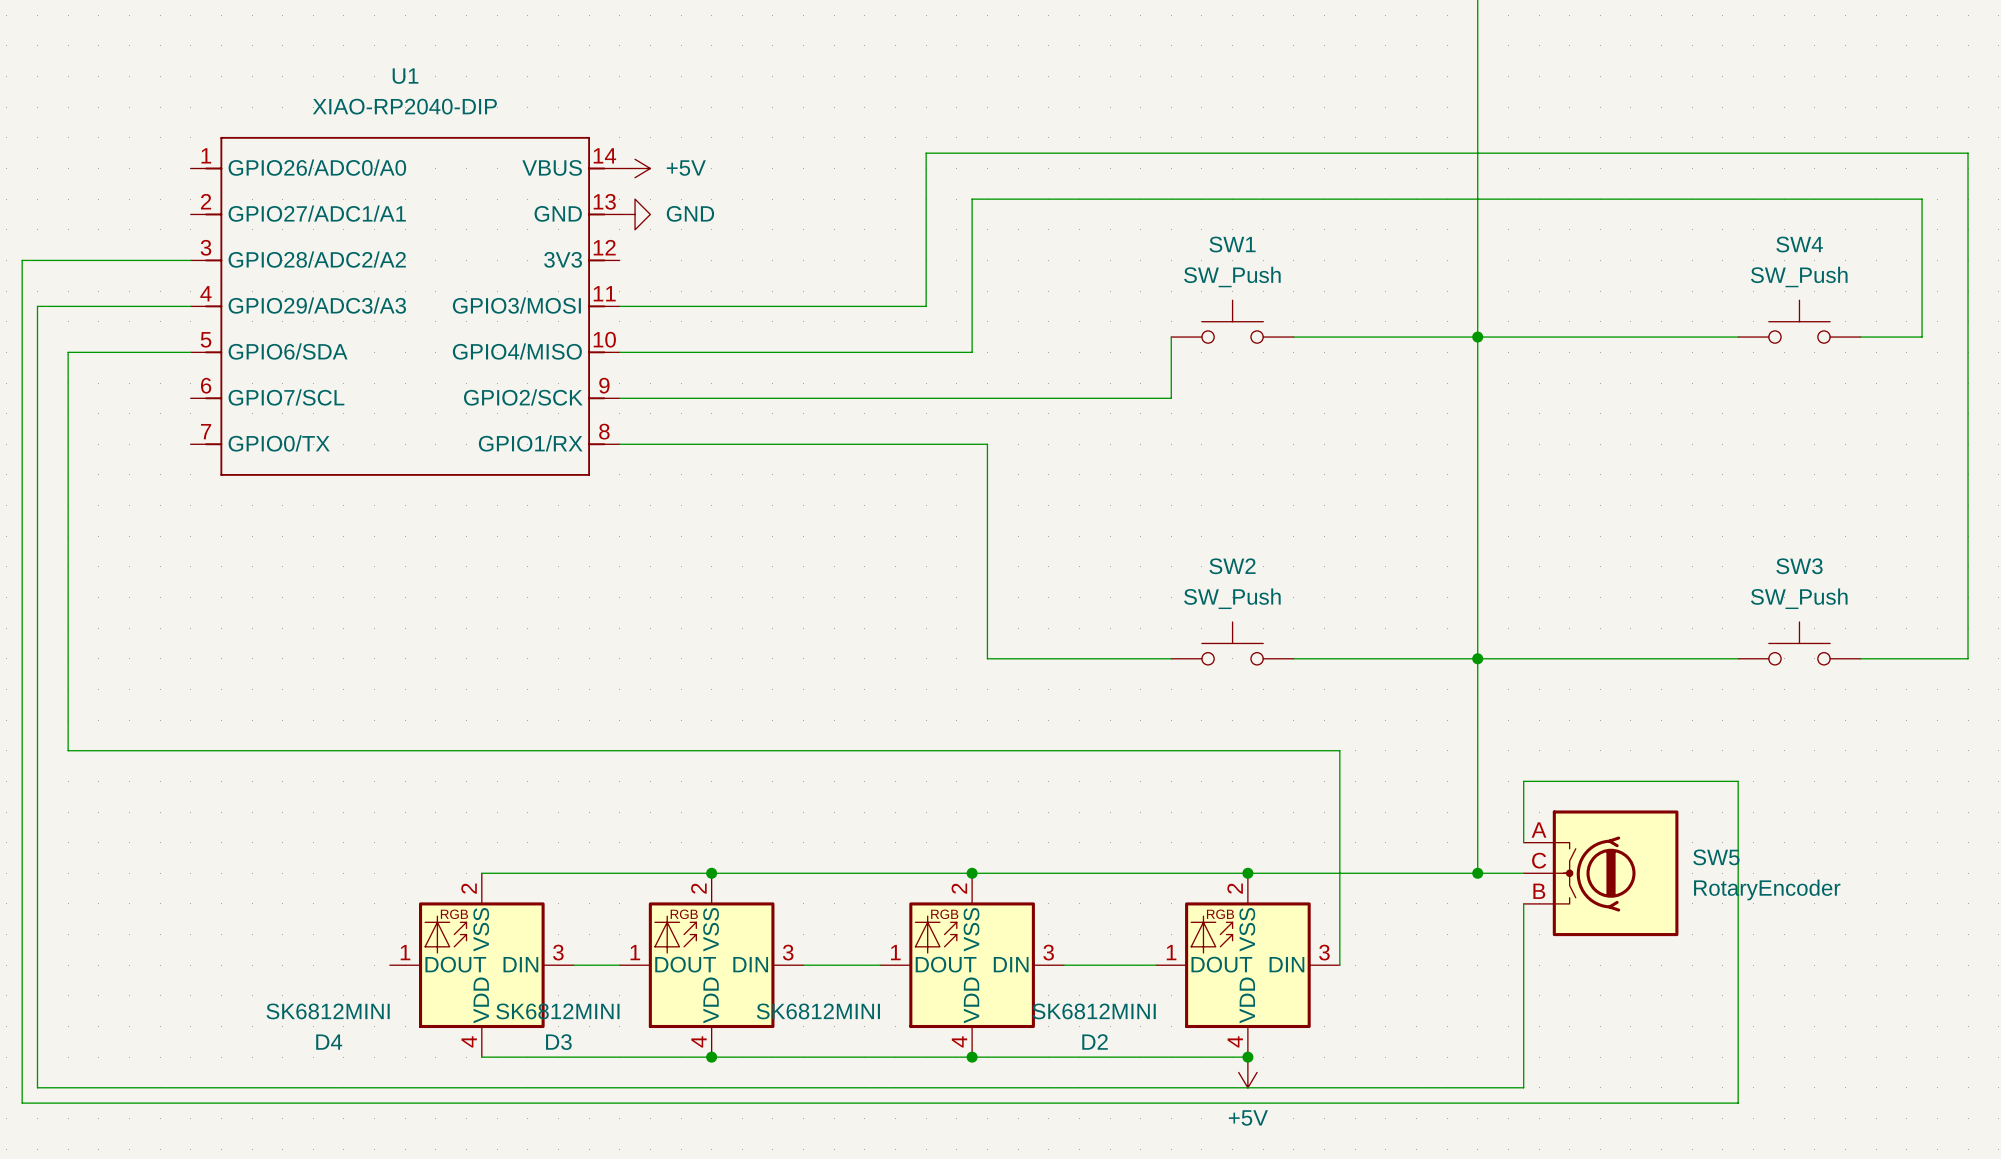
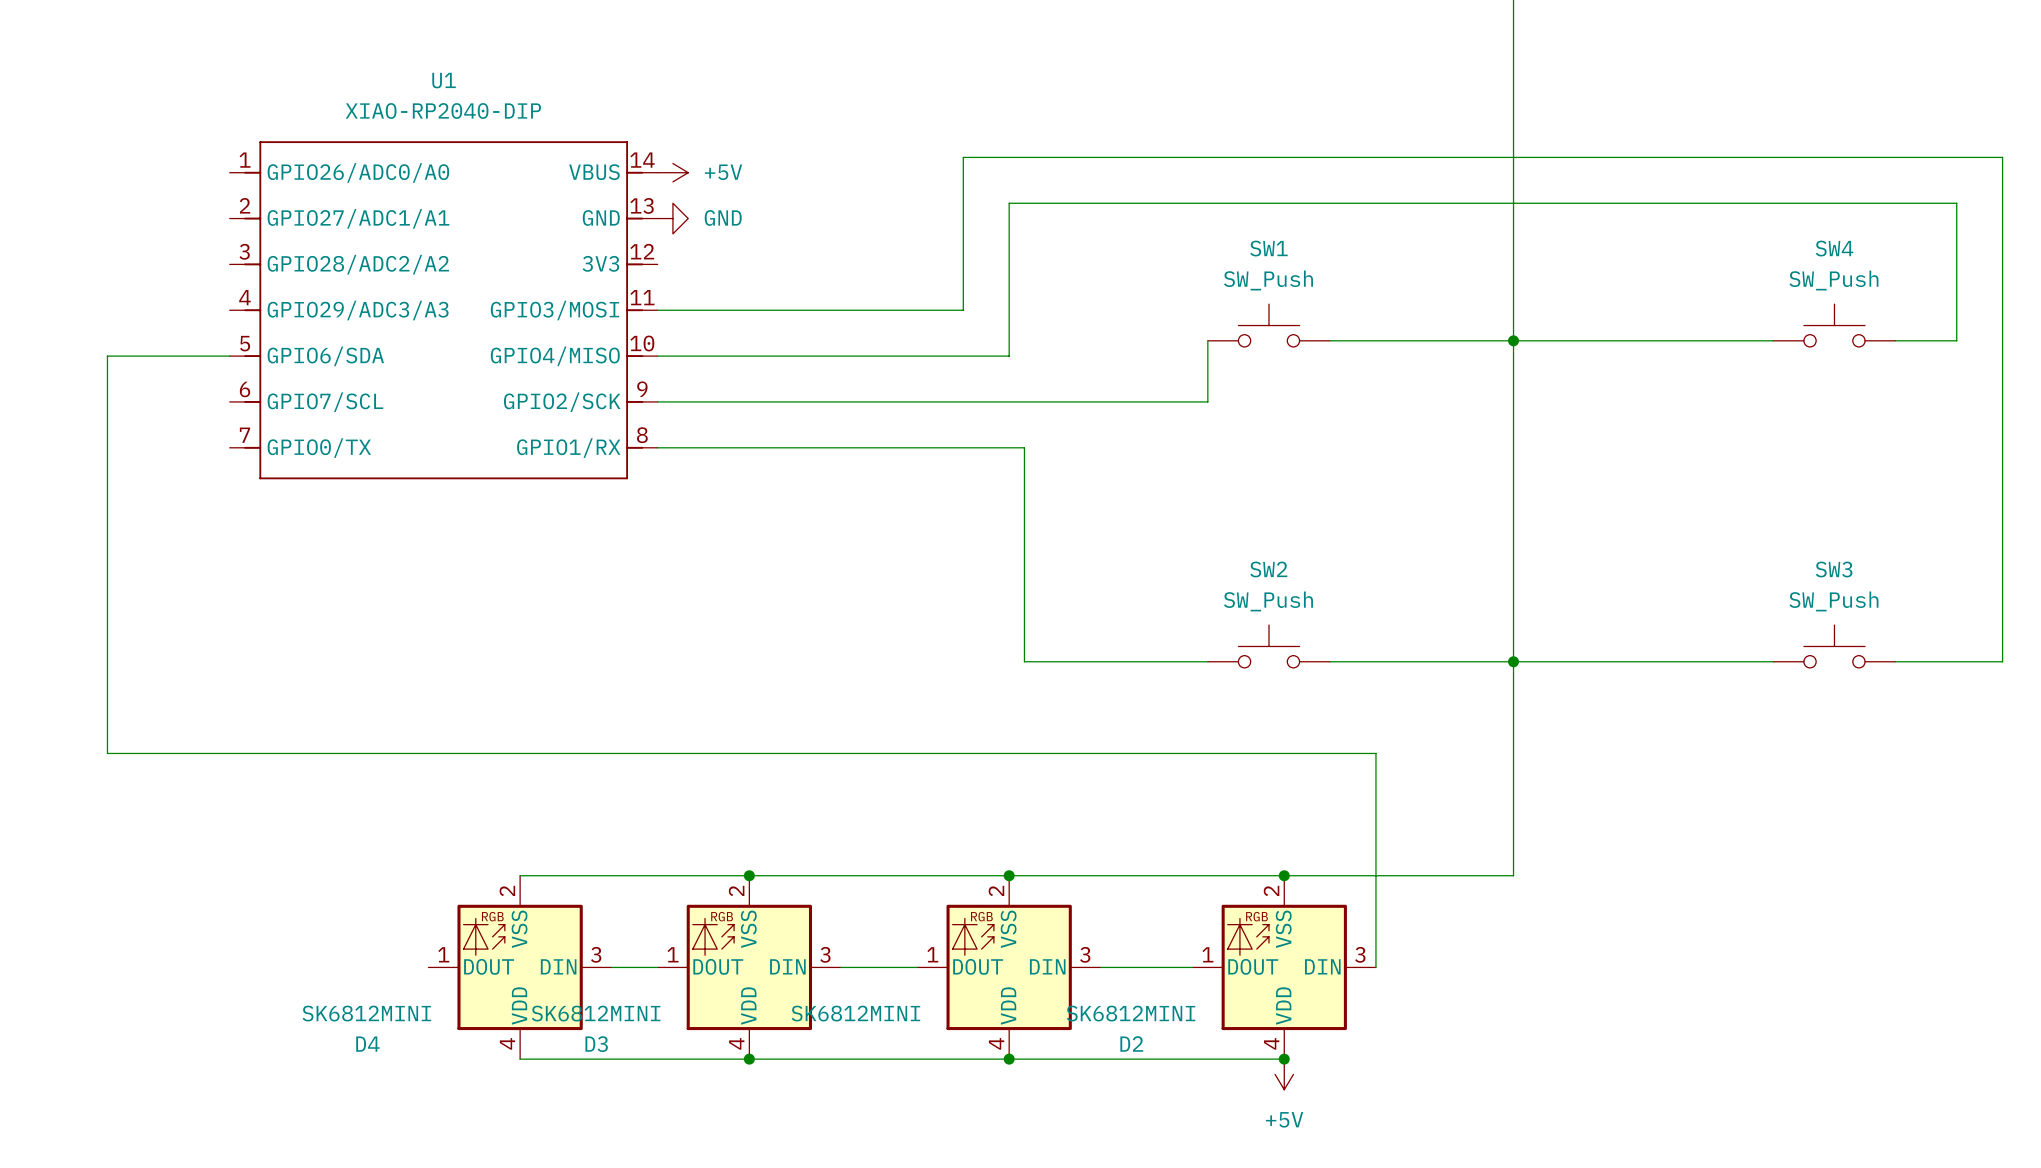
wire: (190, 260) (22, 260) (22, 1103) (1738, 1103) (1738, 781) (1523, 781) (1523, 842) -> none
wire: (190, 306) (37, 306) (37, 1087) (1523, 1087) (1523, 903) -> none
wire: (1477, 873) (1523, 873) -> none
junction: (1477, 873) -> none
SW5: RotaryEncoder (1601, 873) -> none

